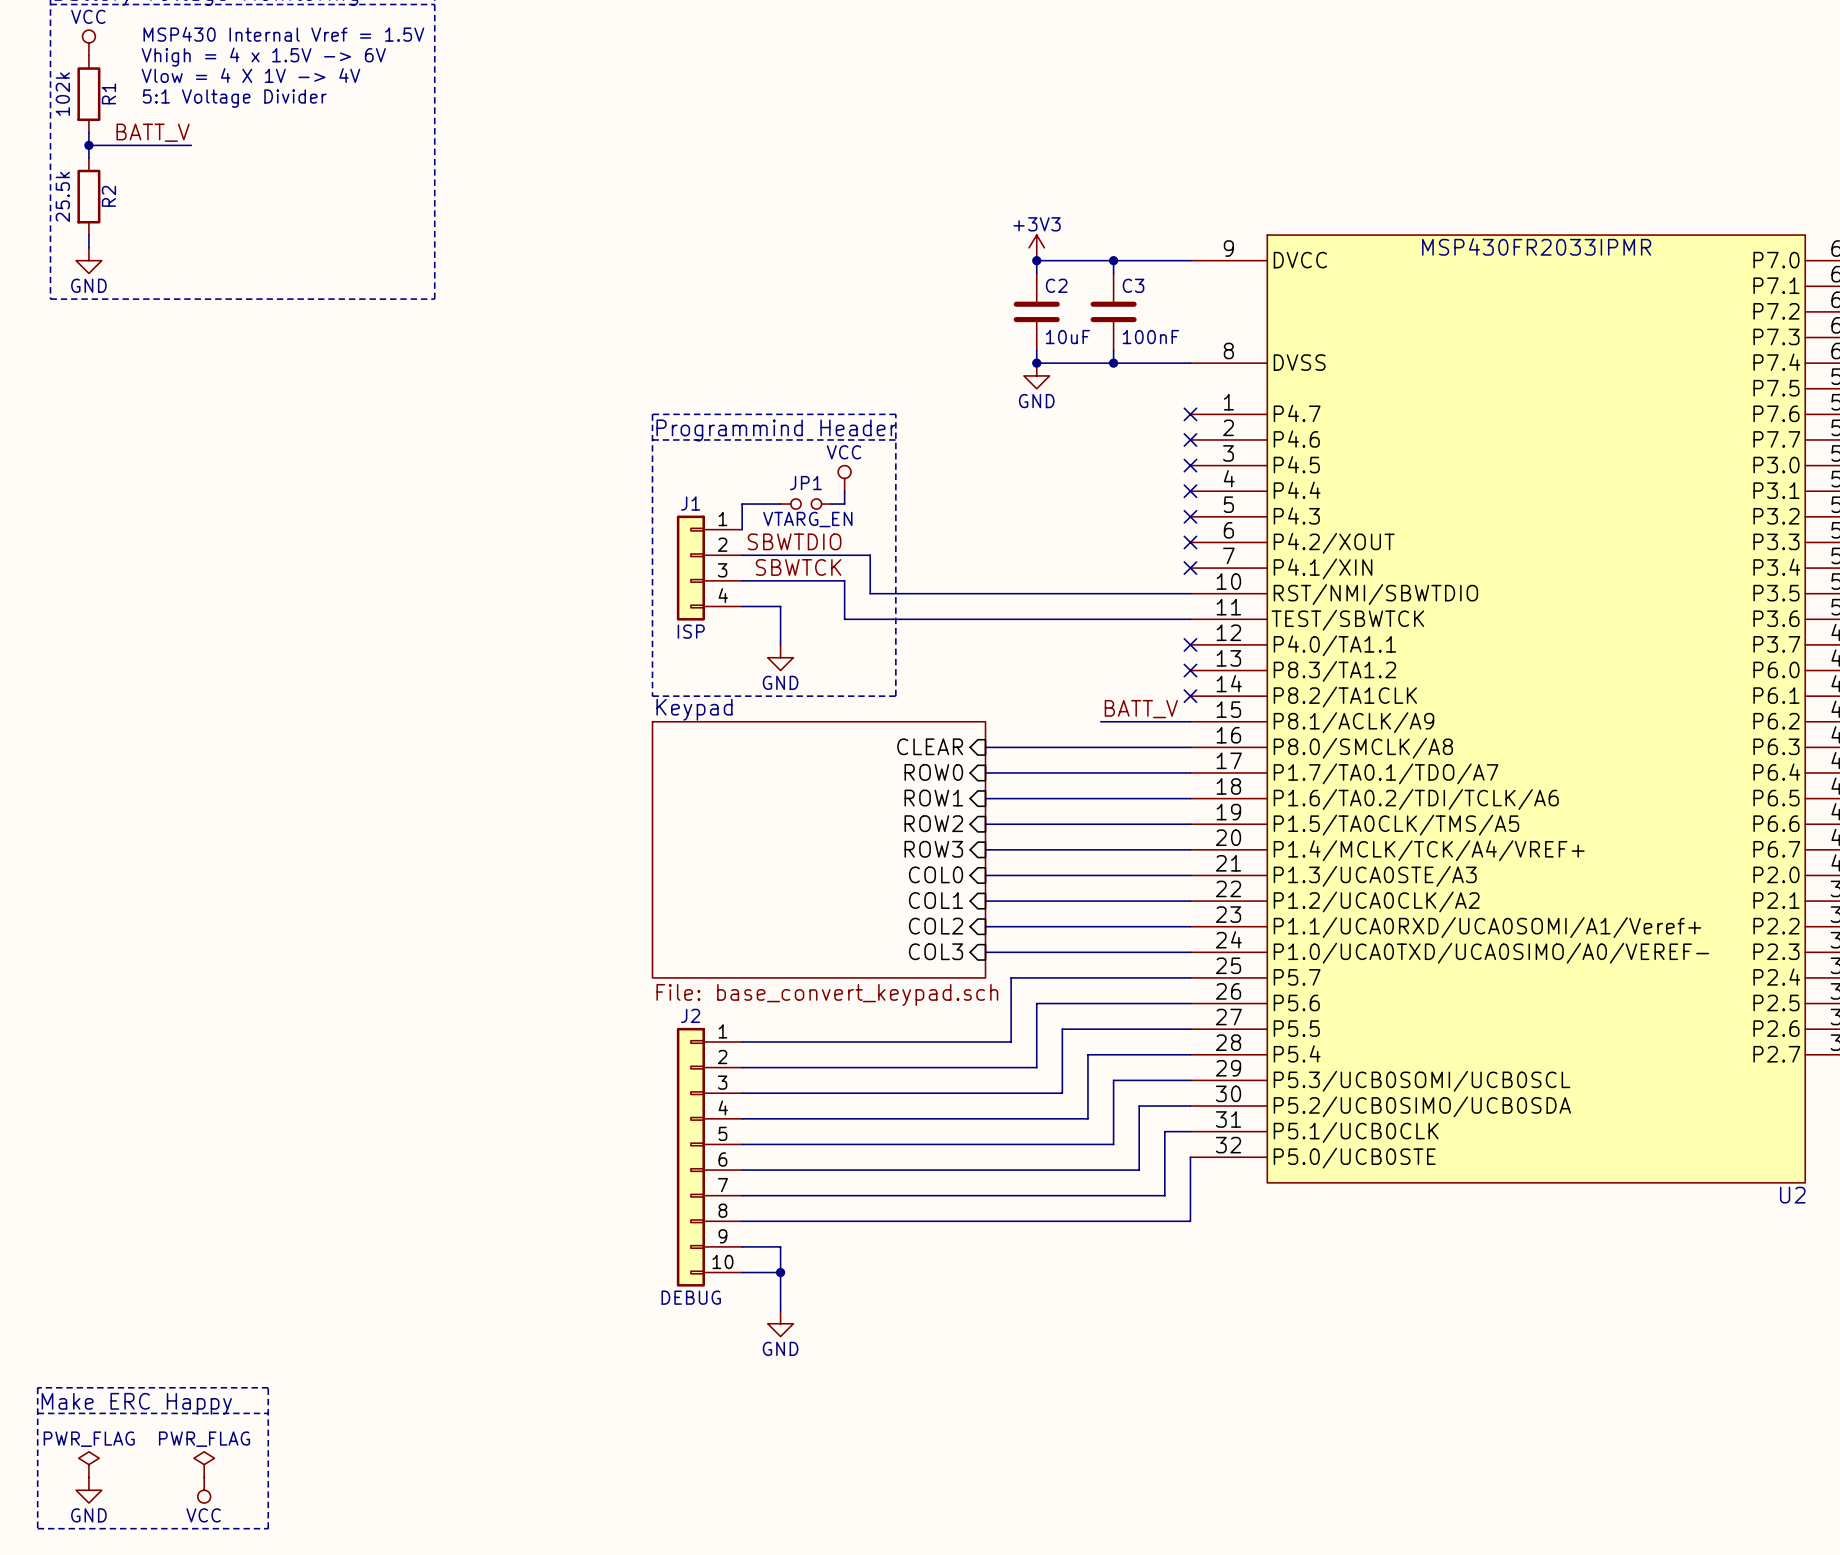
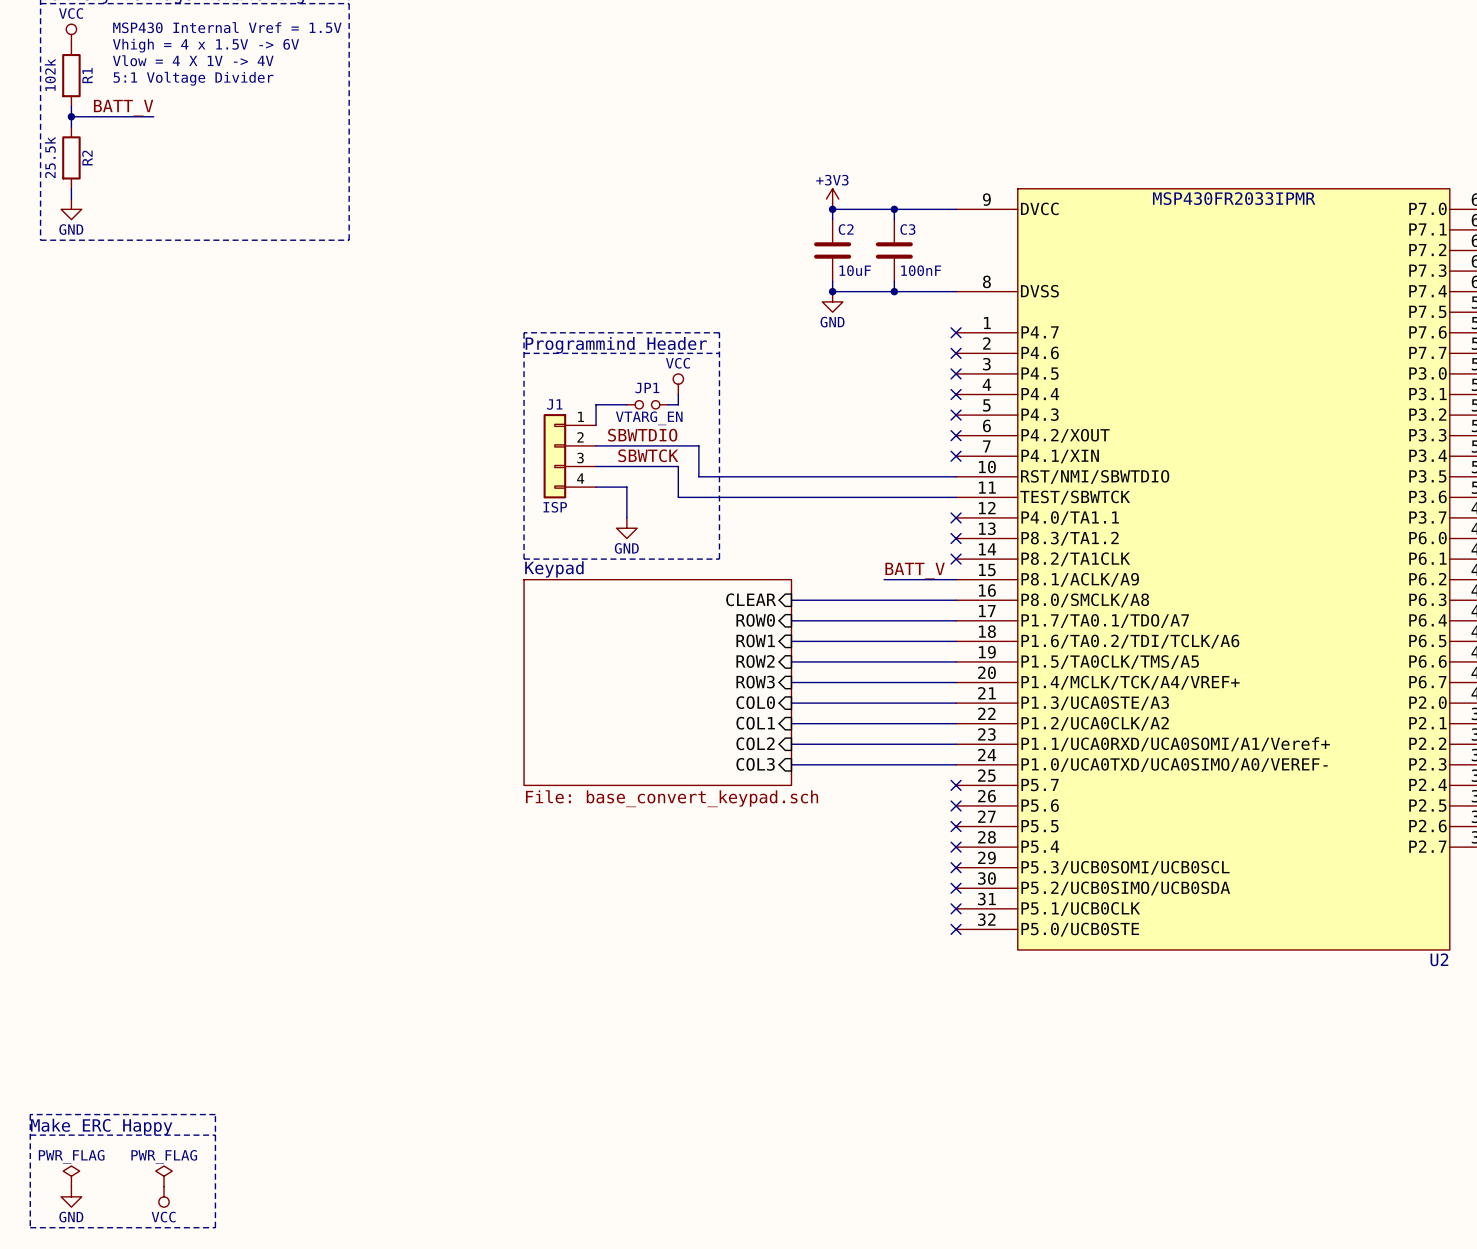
wire: (1190, 977) (1011, 977) (1011, 1041) (742, 1041) -> none
no-connect mark: none -> (956, 785)
wire: (1190, 1003) (1036, 1003) (1036, 1067) (742, 1067) -> none
no-connect mark: none -> (956, 805)
wire: (1190, 1029) (1062, 1029) (1062, 1093) (742, 1093) -> none
no-connect mark: none -> (956, 826)
wire: (1190, 1054) (1087, 1054) (1087, 1118) (742, 1118) -> none
no-connect mark: none -> (956, 847)
wire: (1190, 1080) (1113, 1080) (1113, 1144) (742, 1144) -> none
no-connect mark: none -> (956, 867)
wire: (1190, 1106) (1139, 1106) (1139, 1170) (742, 1170) -> none
no-connect mark: none -> (956, 888)
wire: (1190, 1131) (1164, 1131) (1164, 1195) (742, 1195) -> none
no-connect mark: none -> (956, 908)
J2: DEBUG (709, 1157) -> none
wire: (1190, 1157) (1190, 1221) (742, 1221) -> none
no-connect mark: none -> (956, 929)
wire: (742, 1246) (780, 1246) (780, 1310) -> none
wire: (742, 1272) (780, 1272) -> none
junction: (780, 1272) -> none
power symbol: GND (780, 1323) -> none

